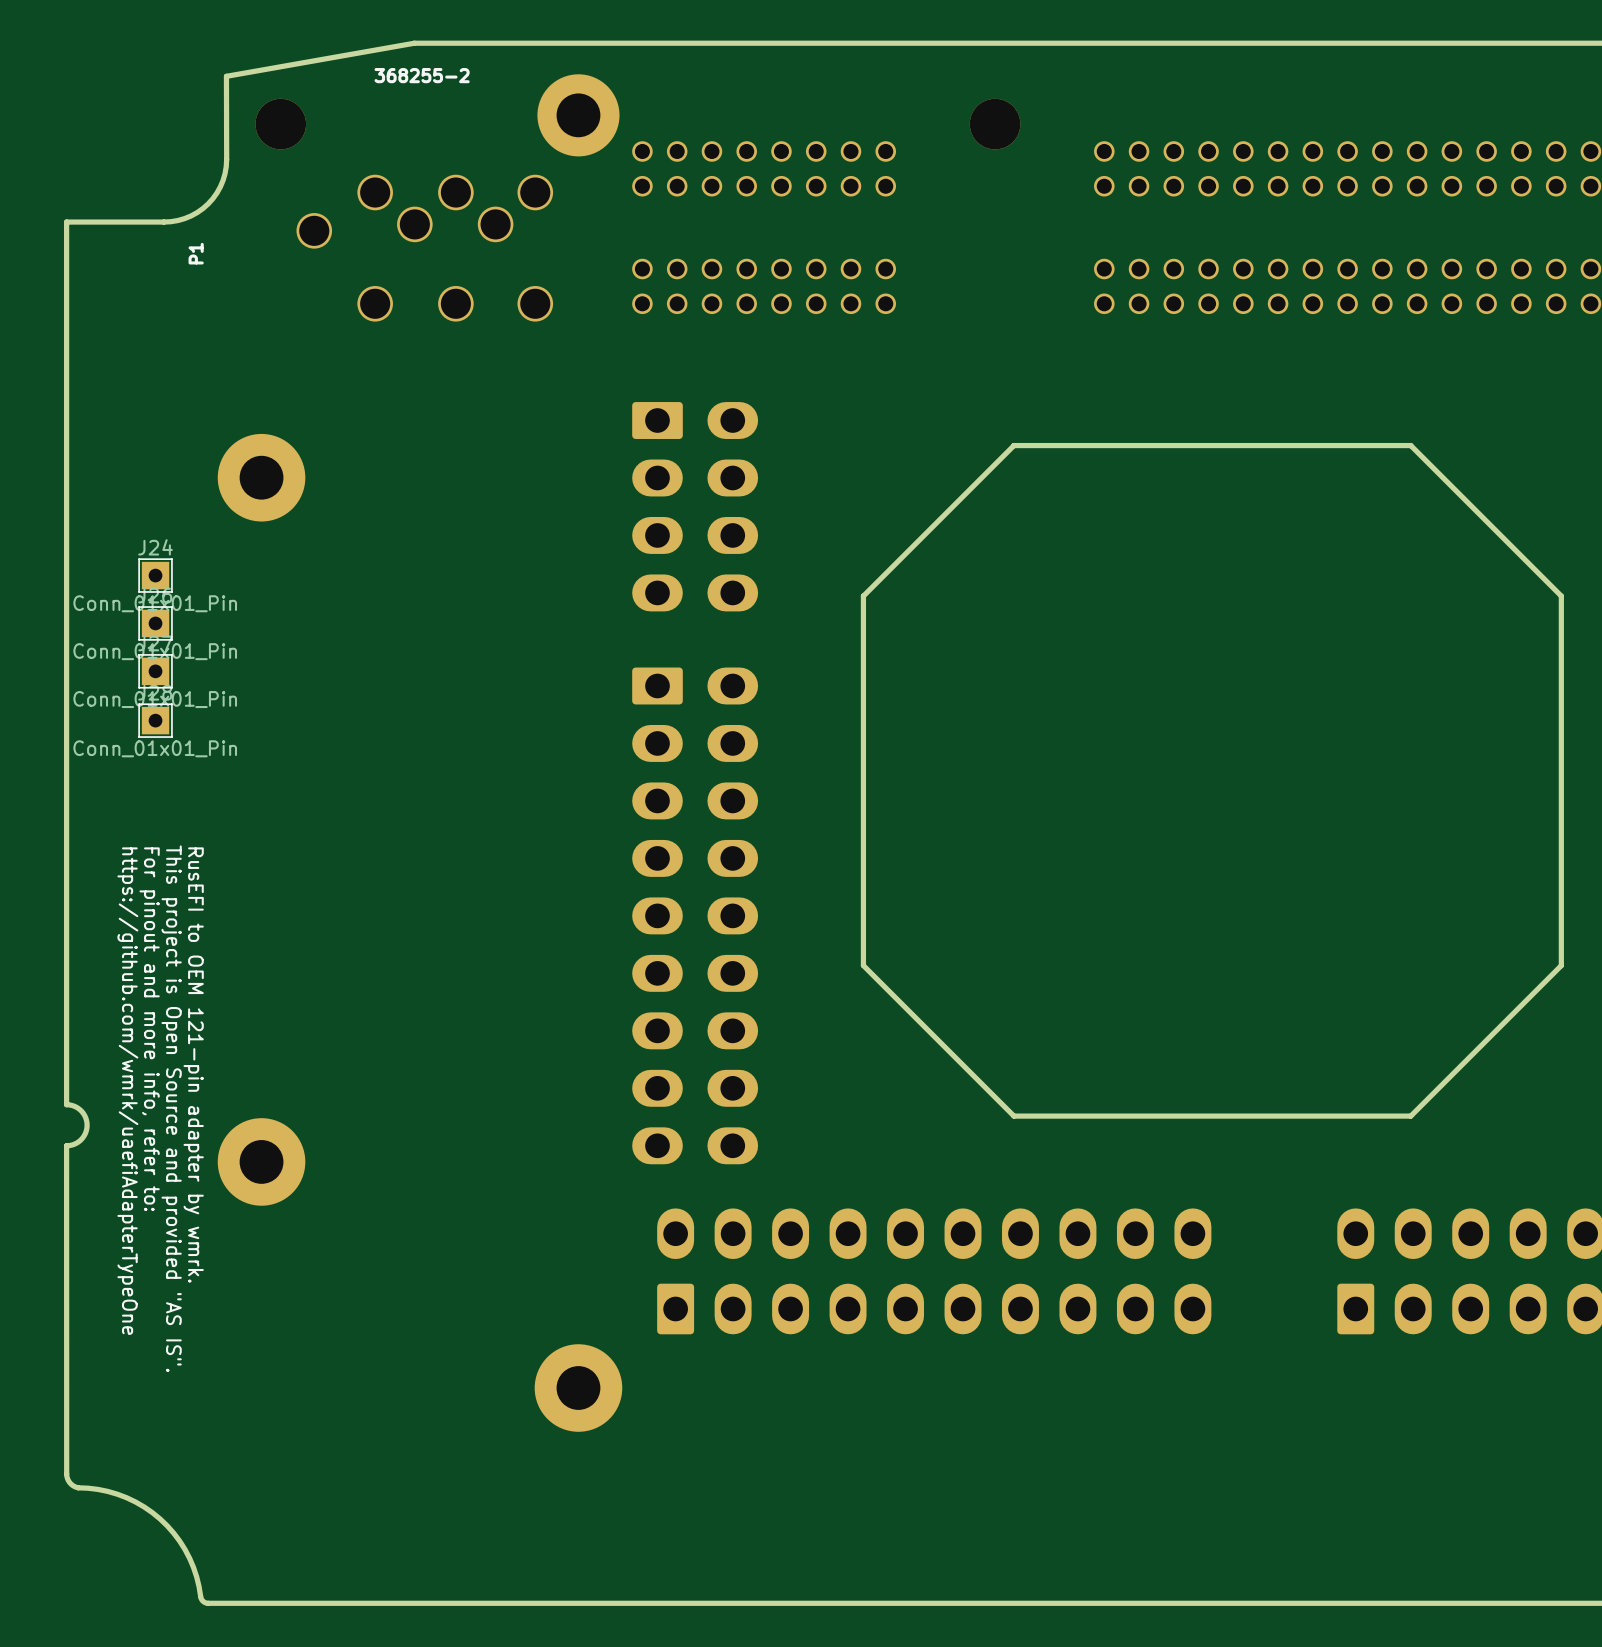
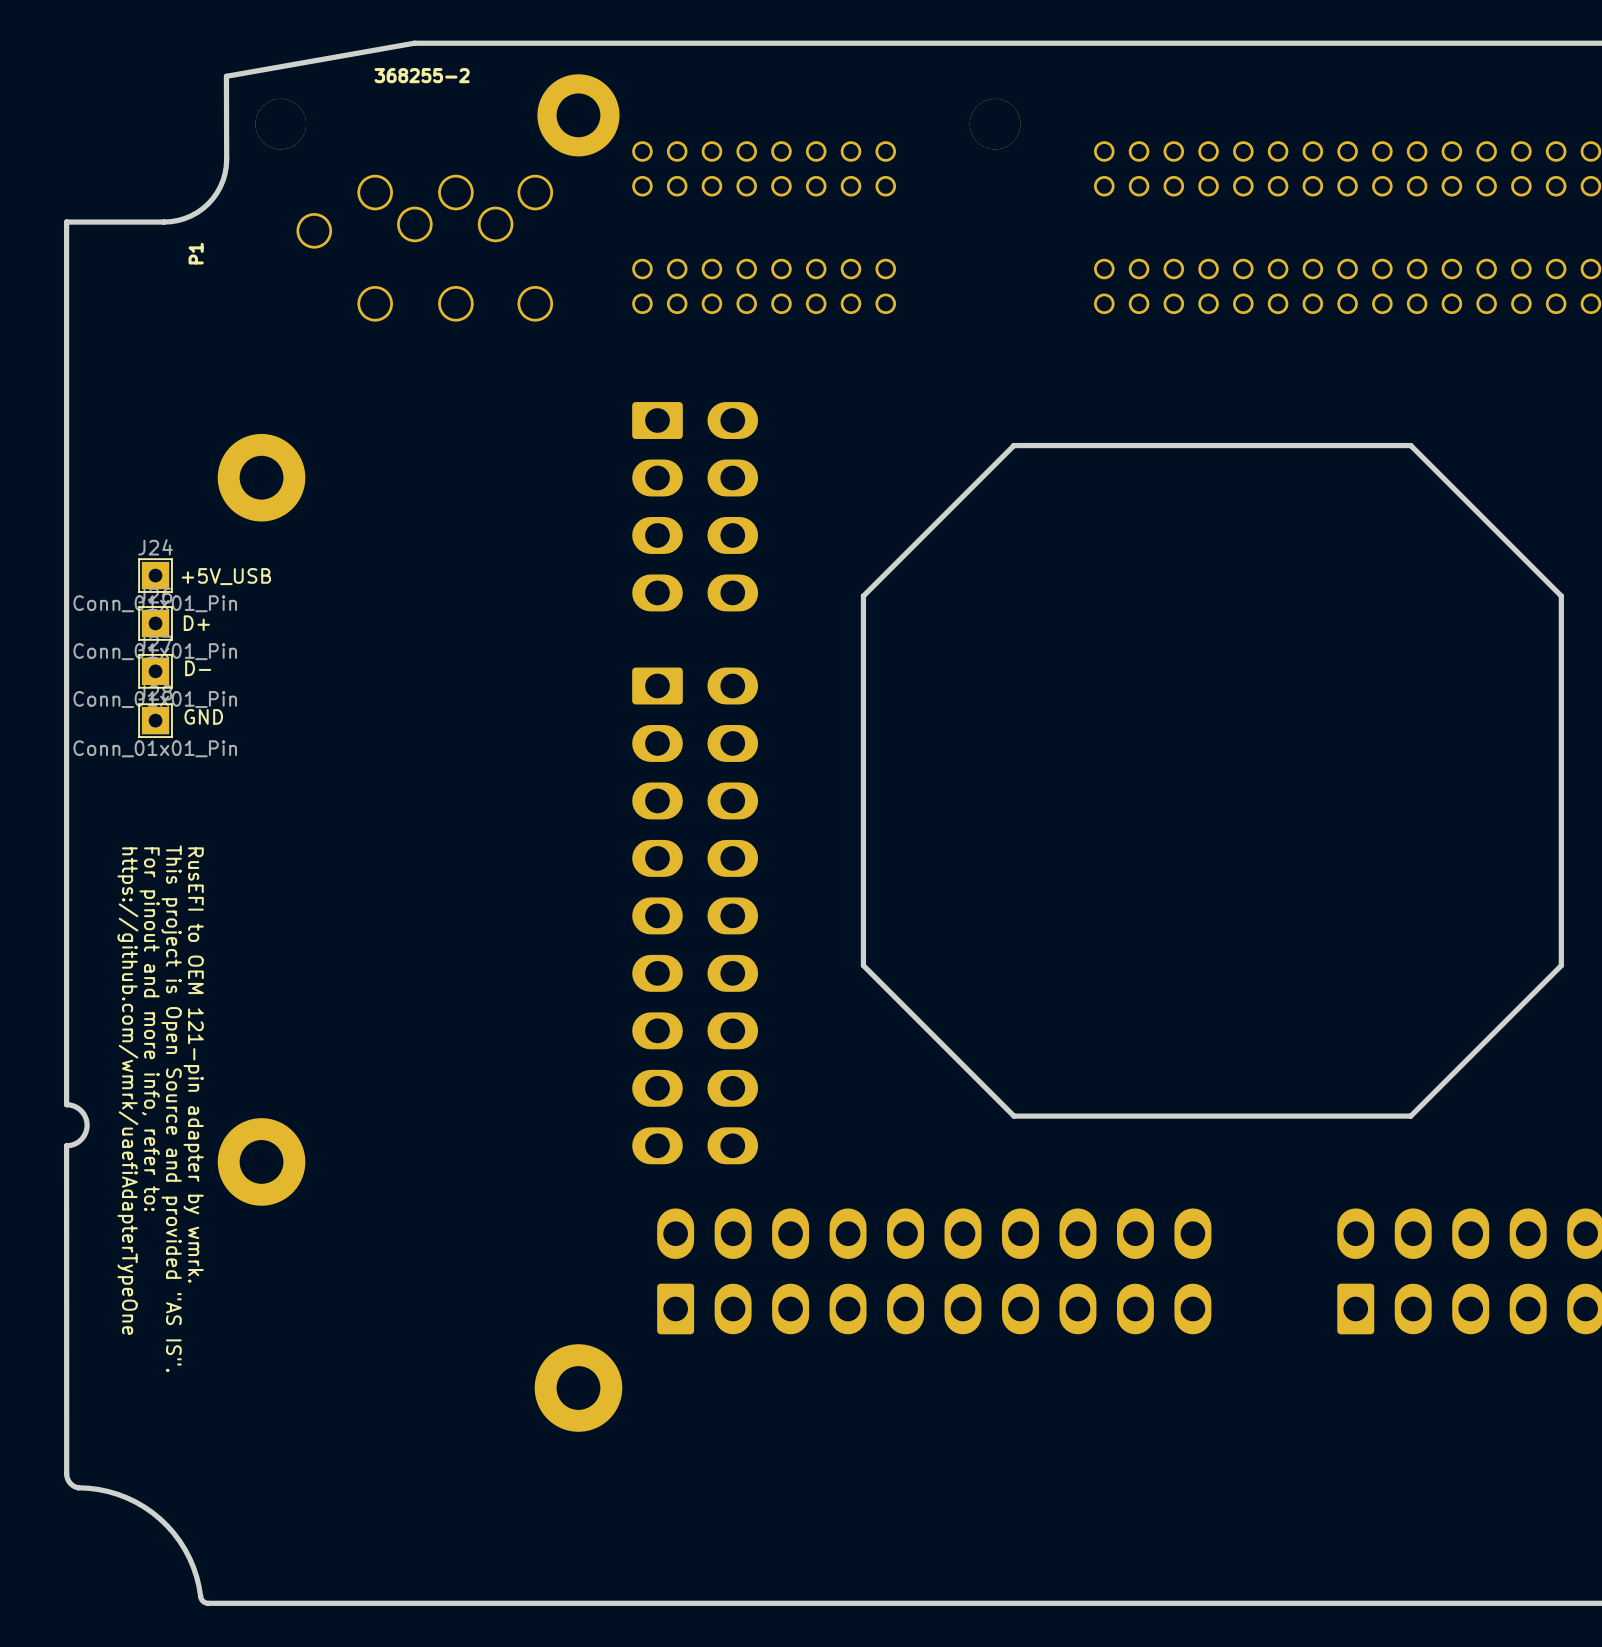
text: none -> +5V_USB (226, 576)
text: none -> D+ (196, 623)
text: none -> D- (198, 668)
text: none -> GND (203, 716)

